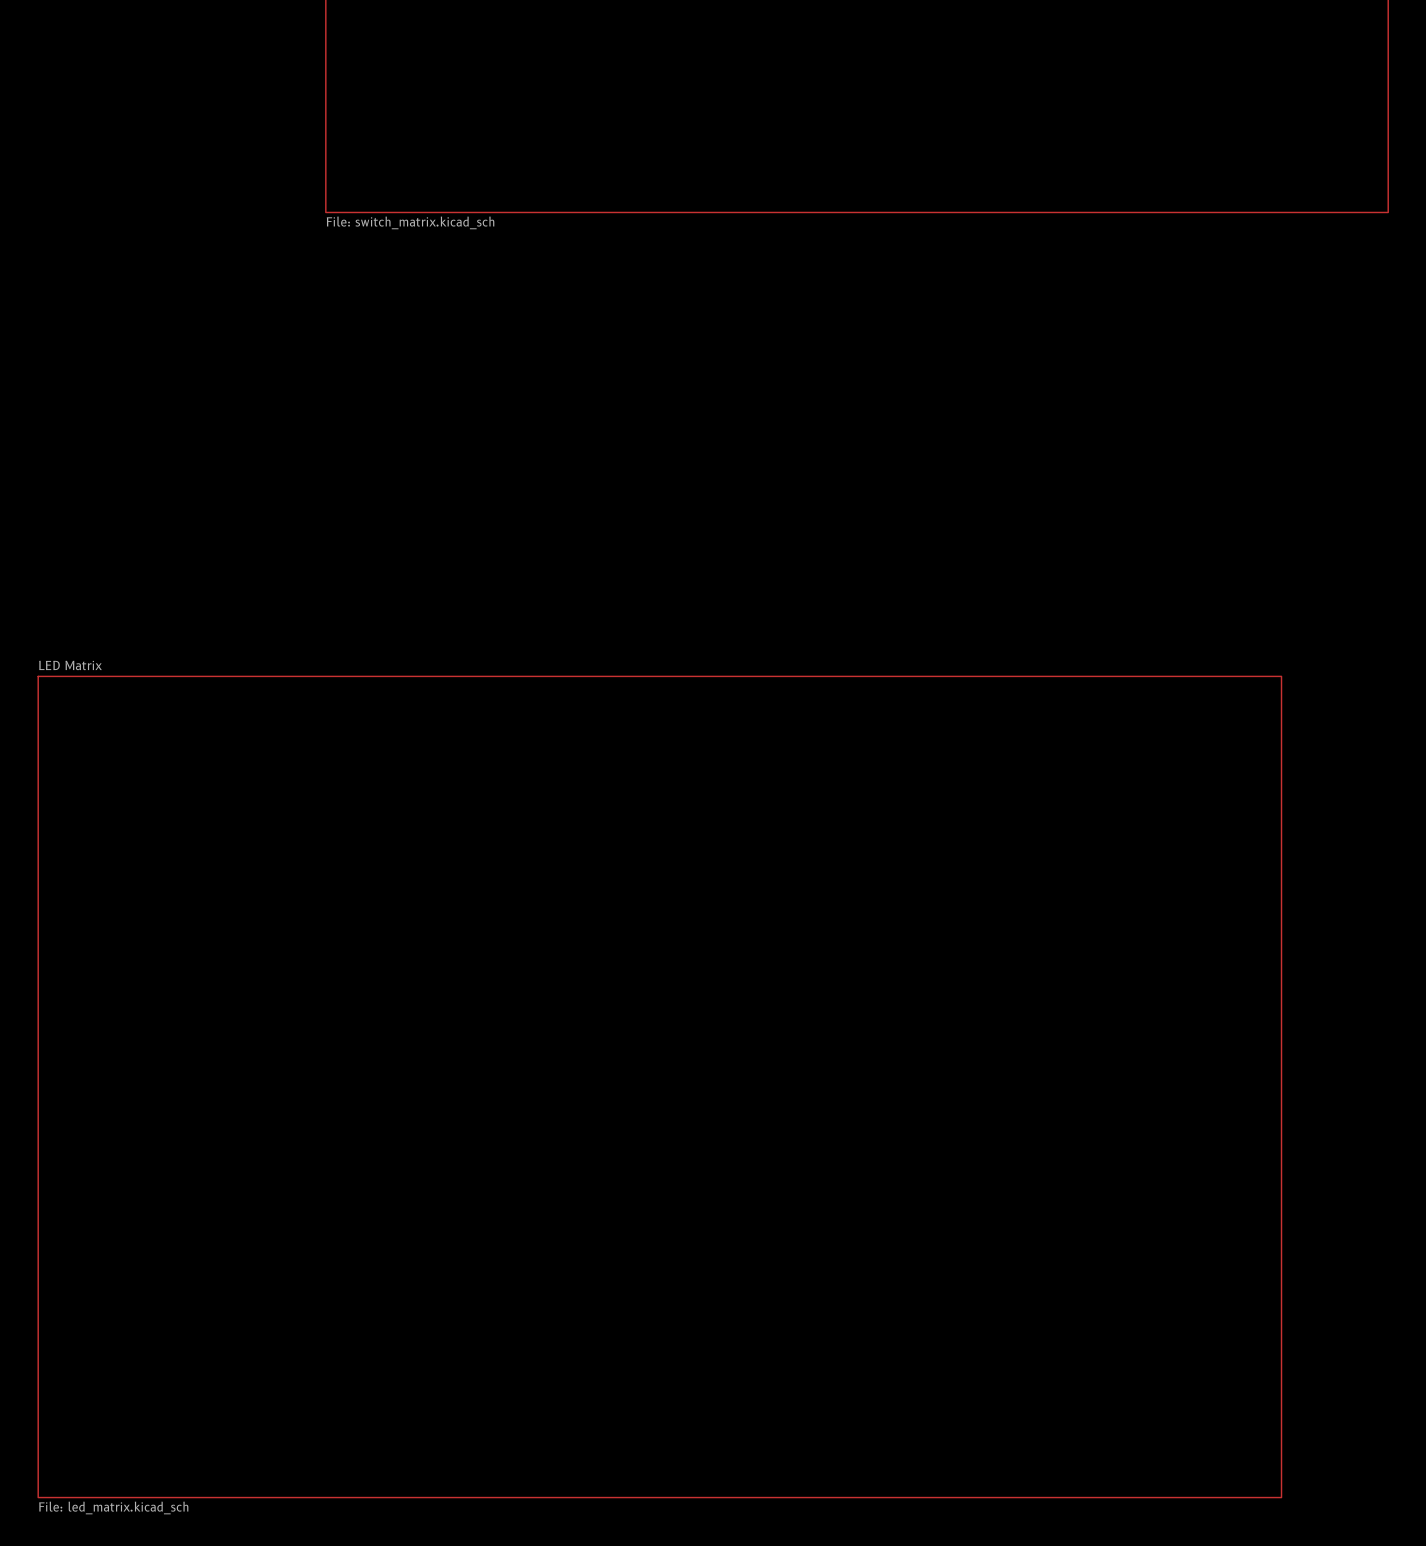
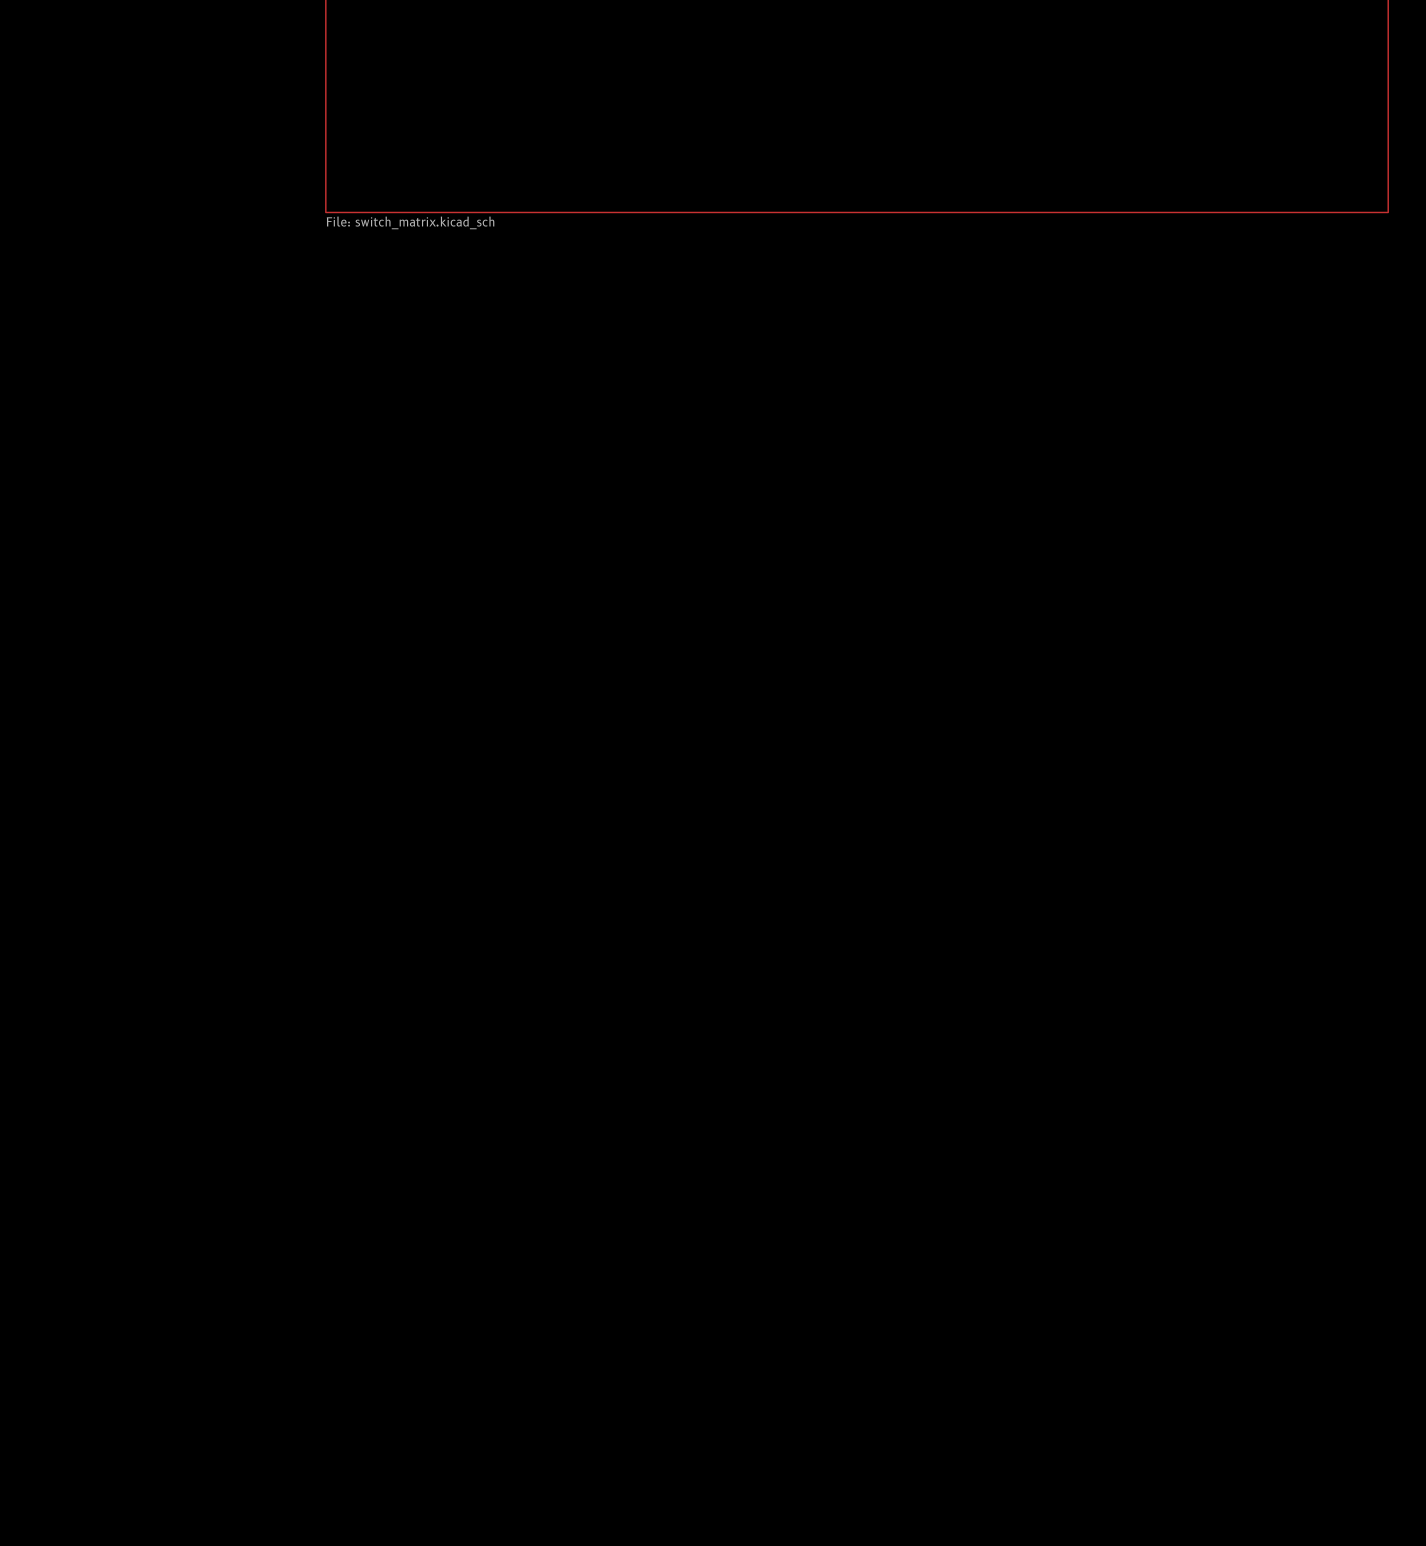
sheet LED Matrix: File: led_matrix.kicad_sch (659, 1086) -> none

